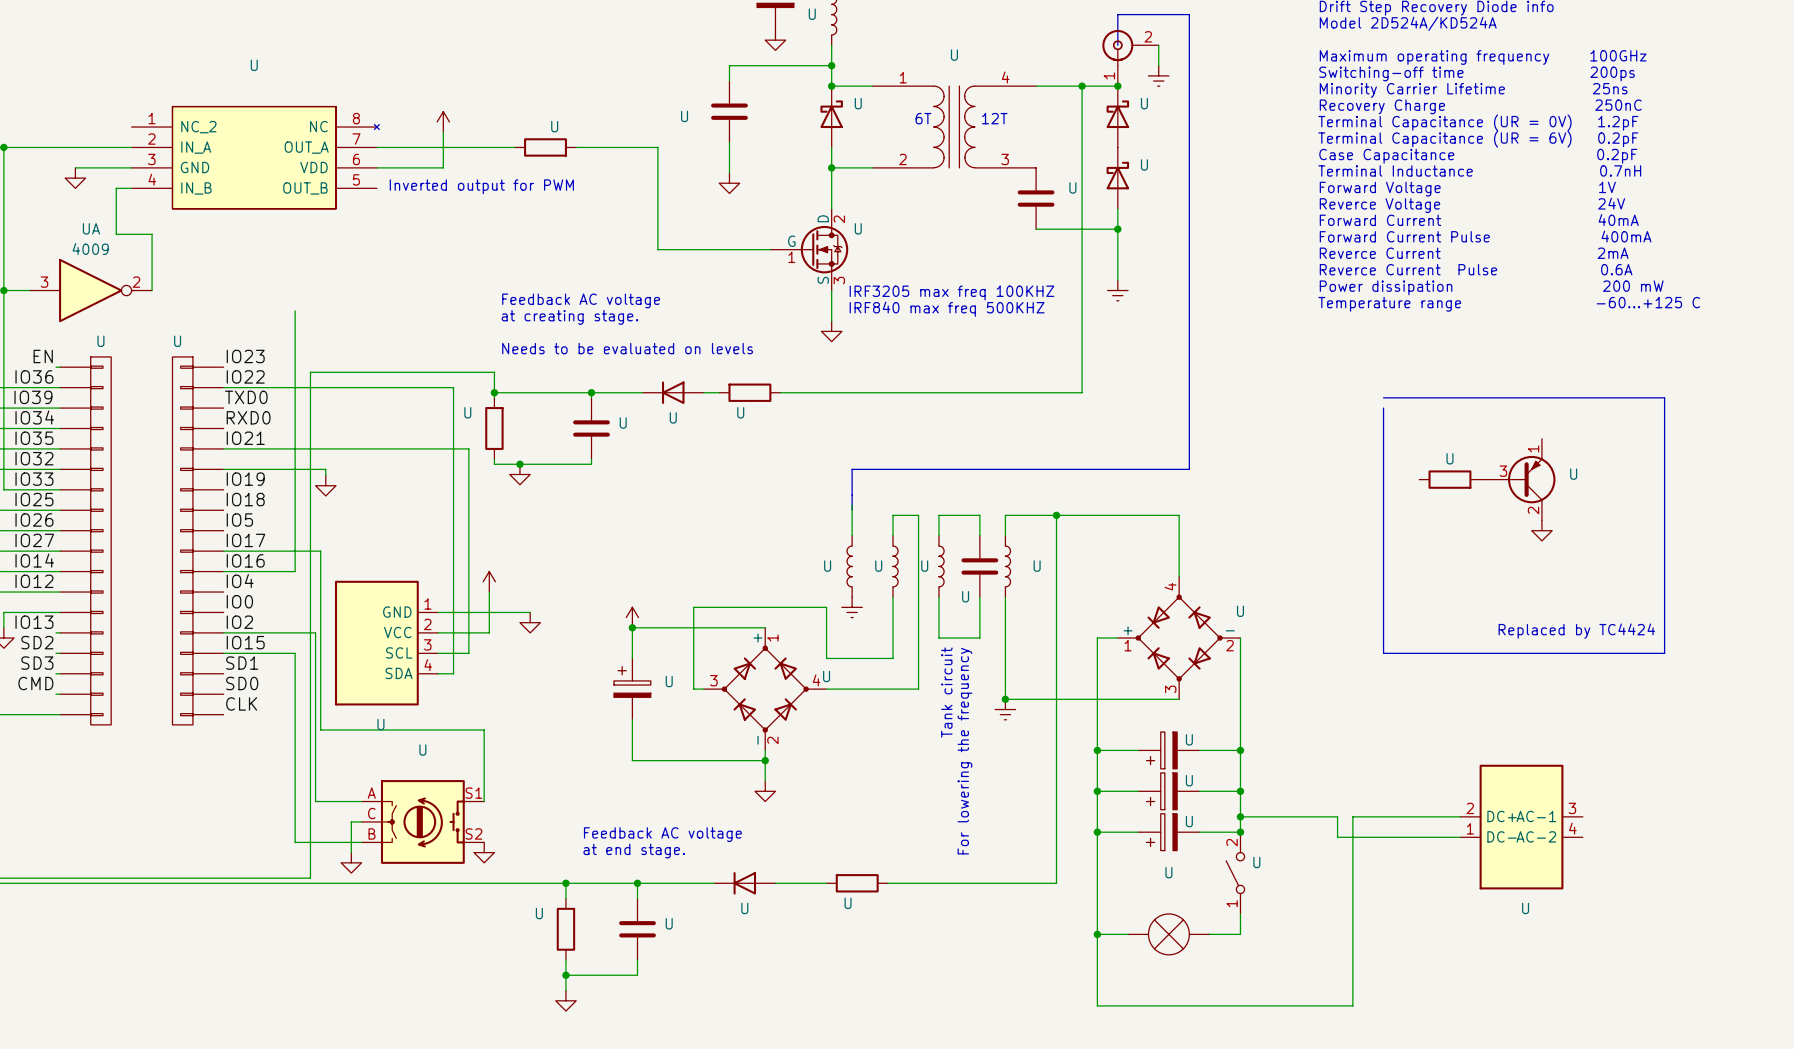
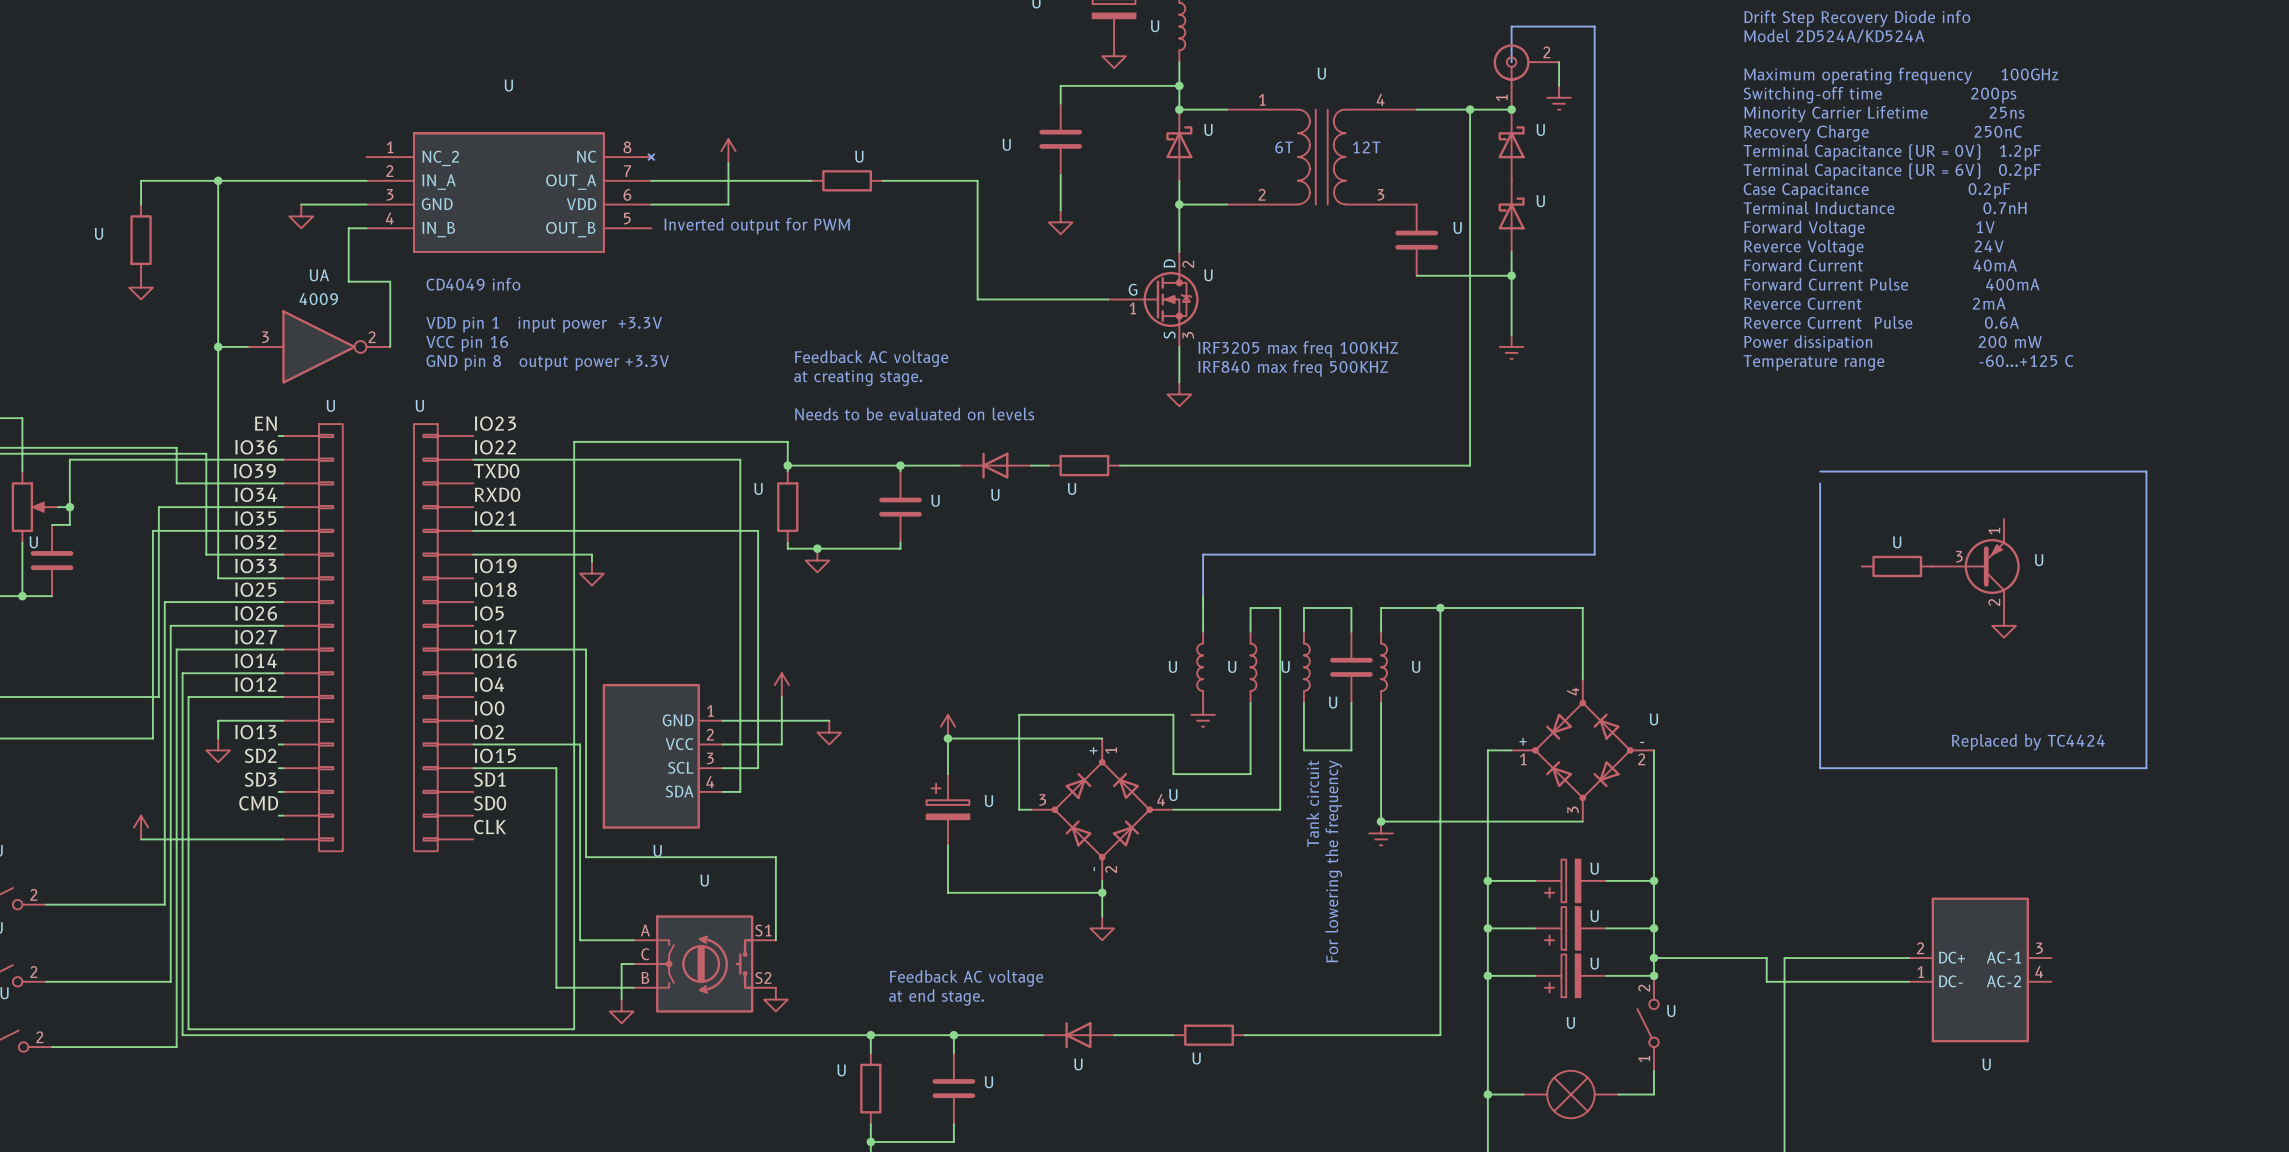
text: none -> CD4049 info (473, 284)
text: none -> VDD pin 1 input power +3.3V (544, 324)
text: none -> VCC pin 16 (467, 343)
text: none -> GND pin 8 output power +3.3V (547, 362)
wire: (295, 310) (295, 571) (223, 571) -> none

